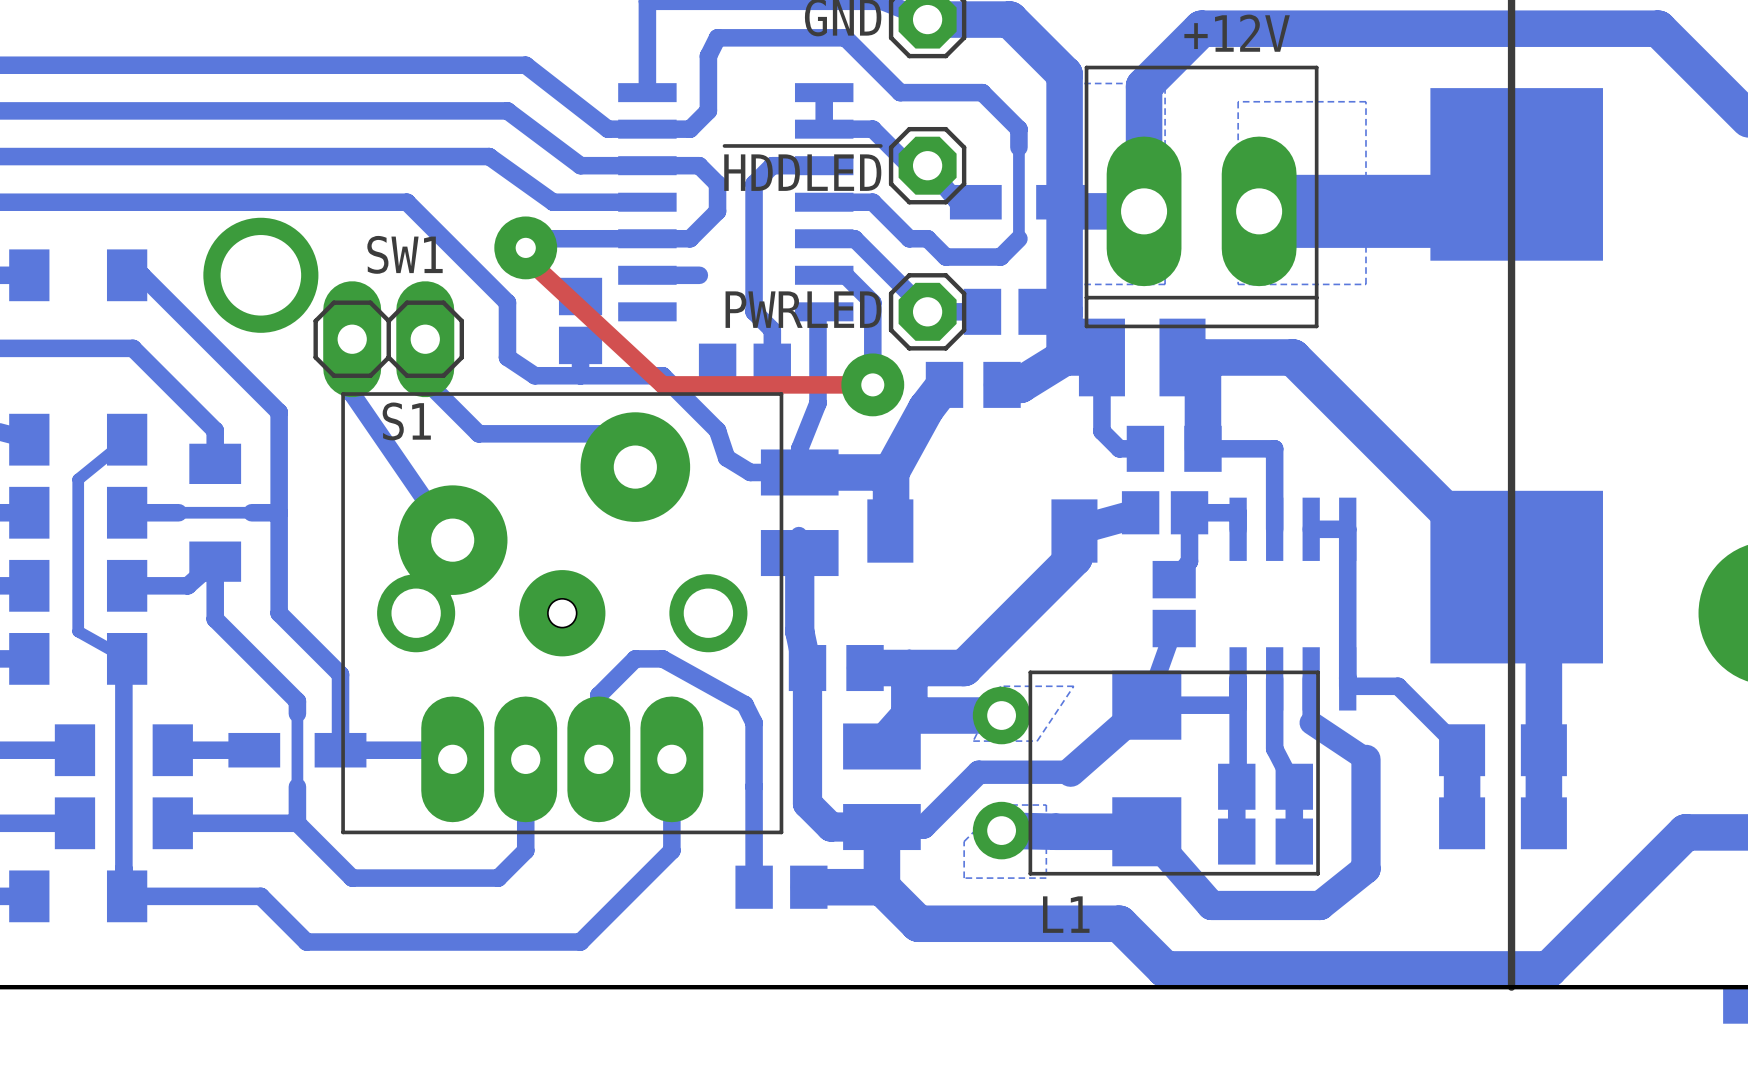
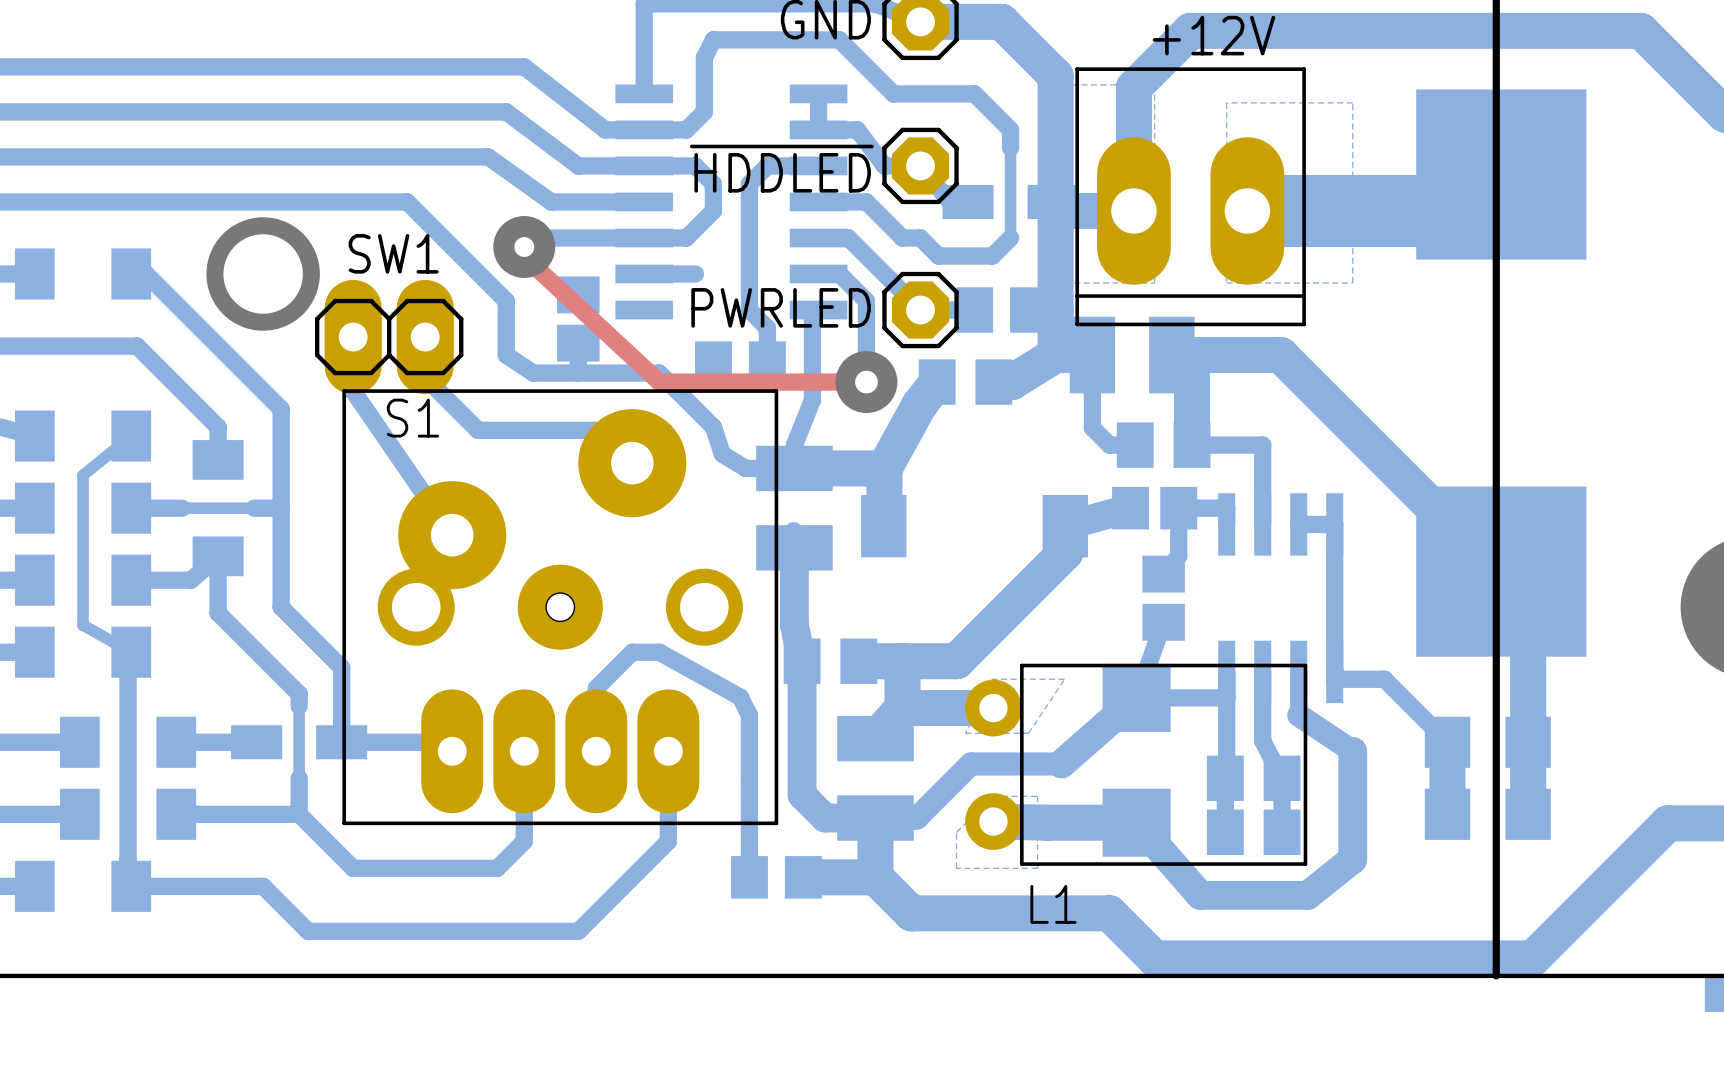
bottom track: (863, 129) (872, 129) (909, 165) -> (857, 129) (884, 165) (902, 165)

